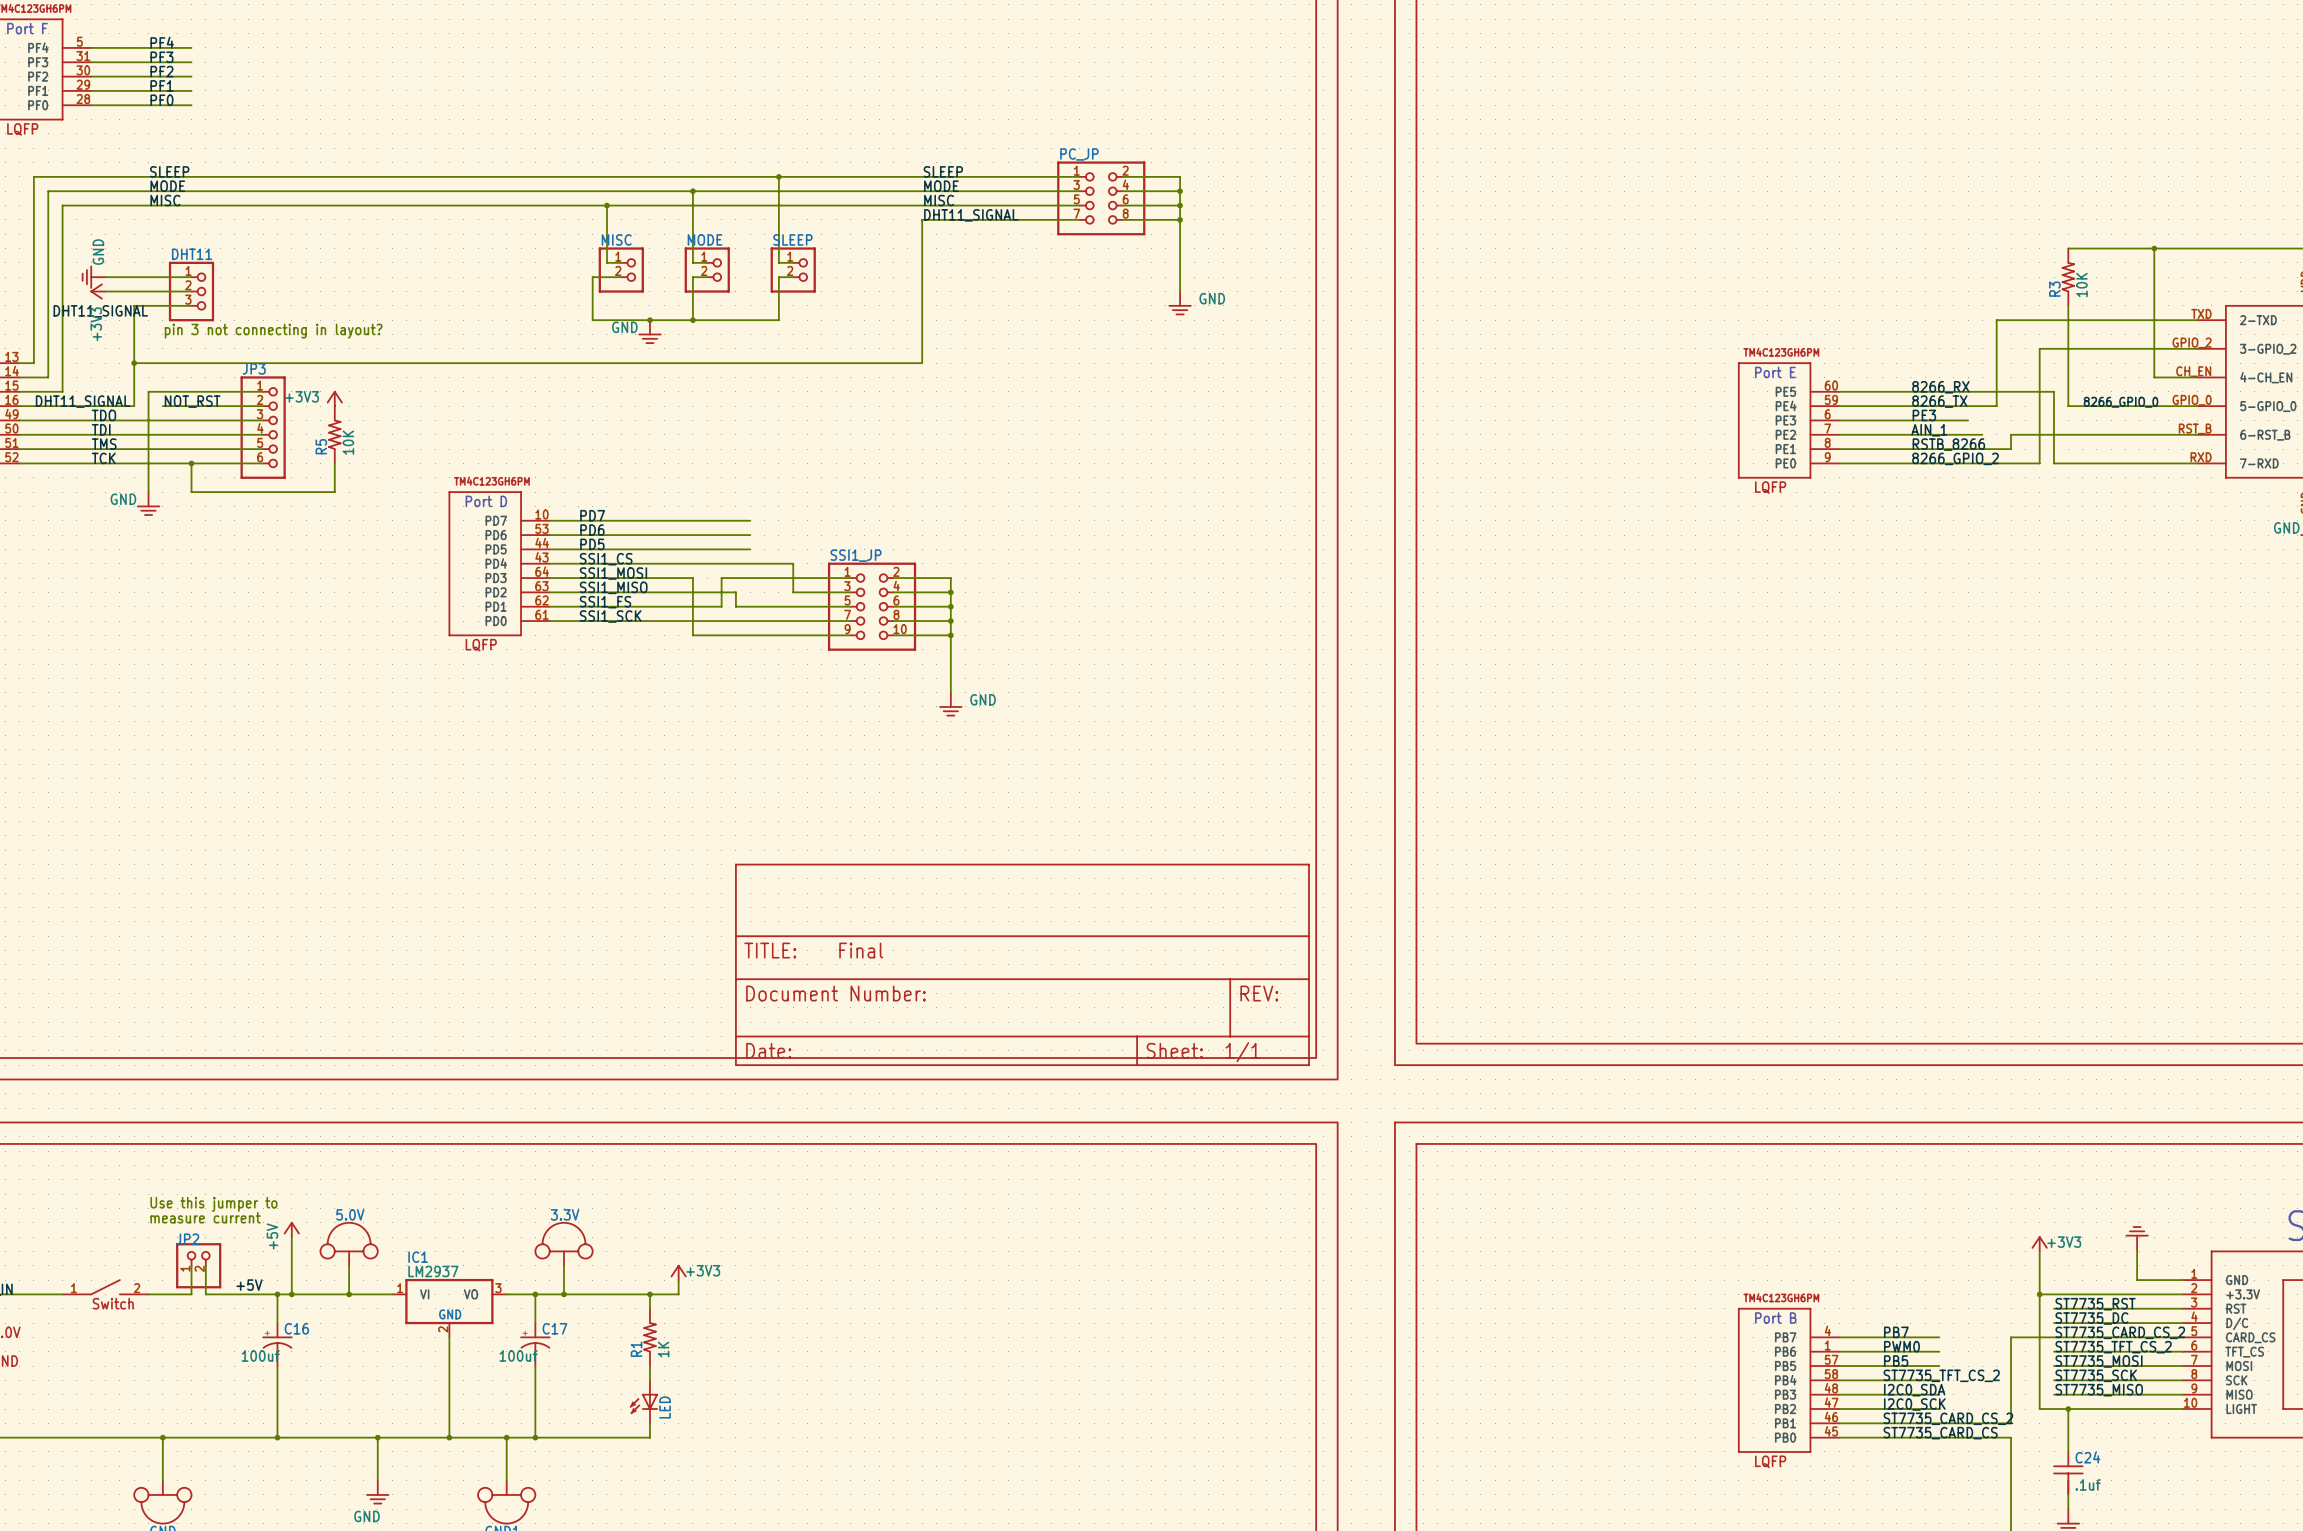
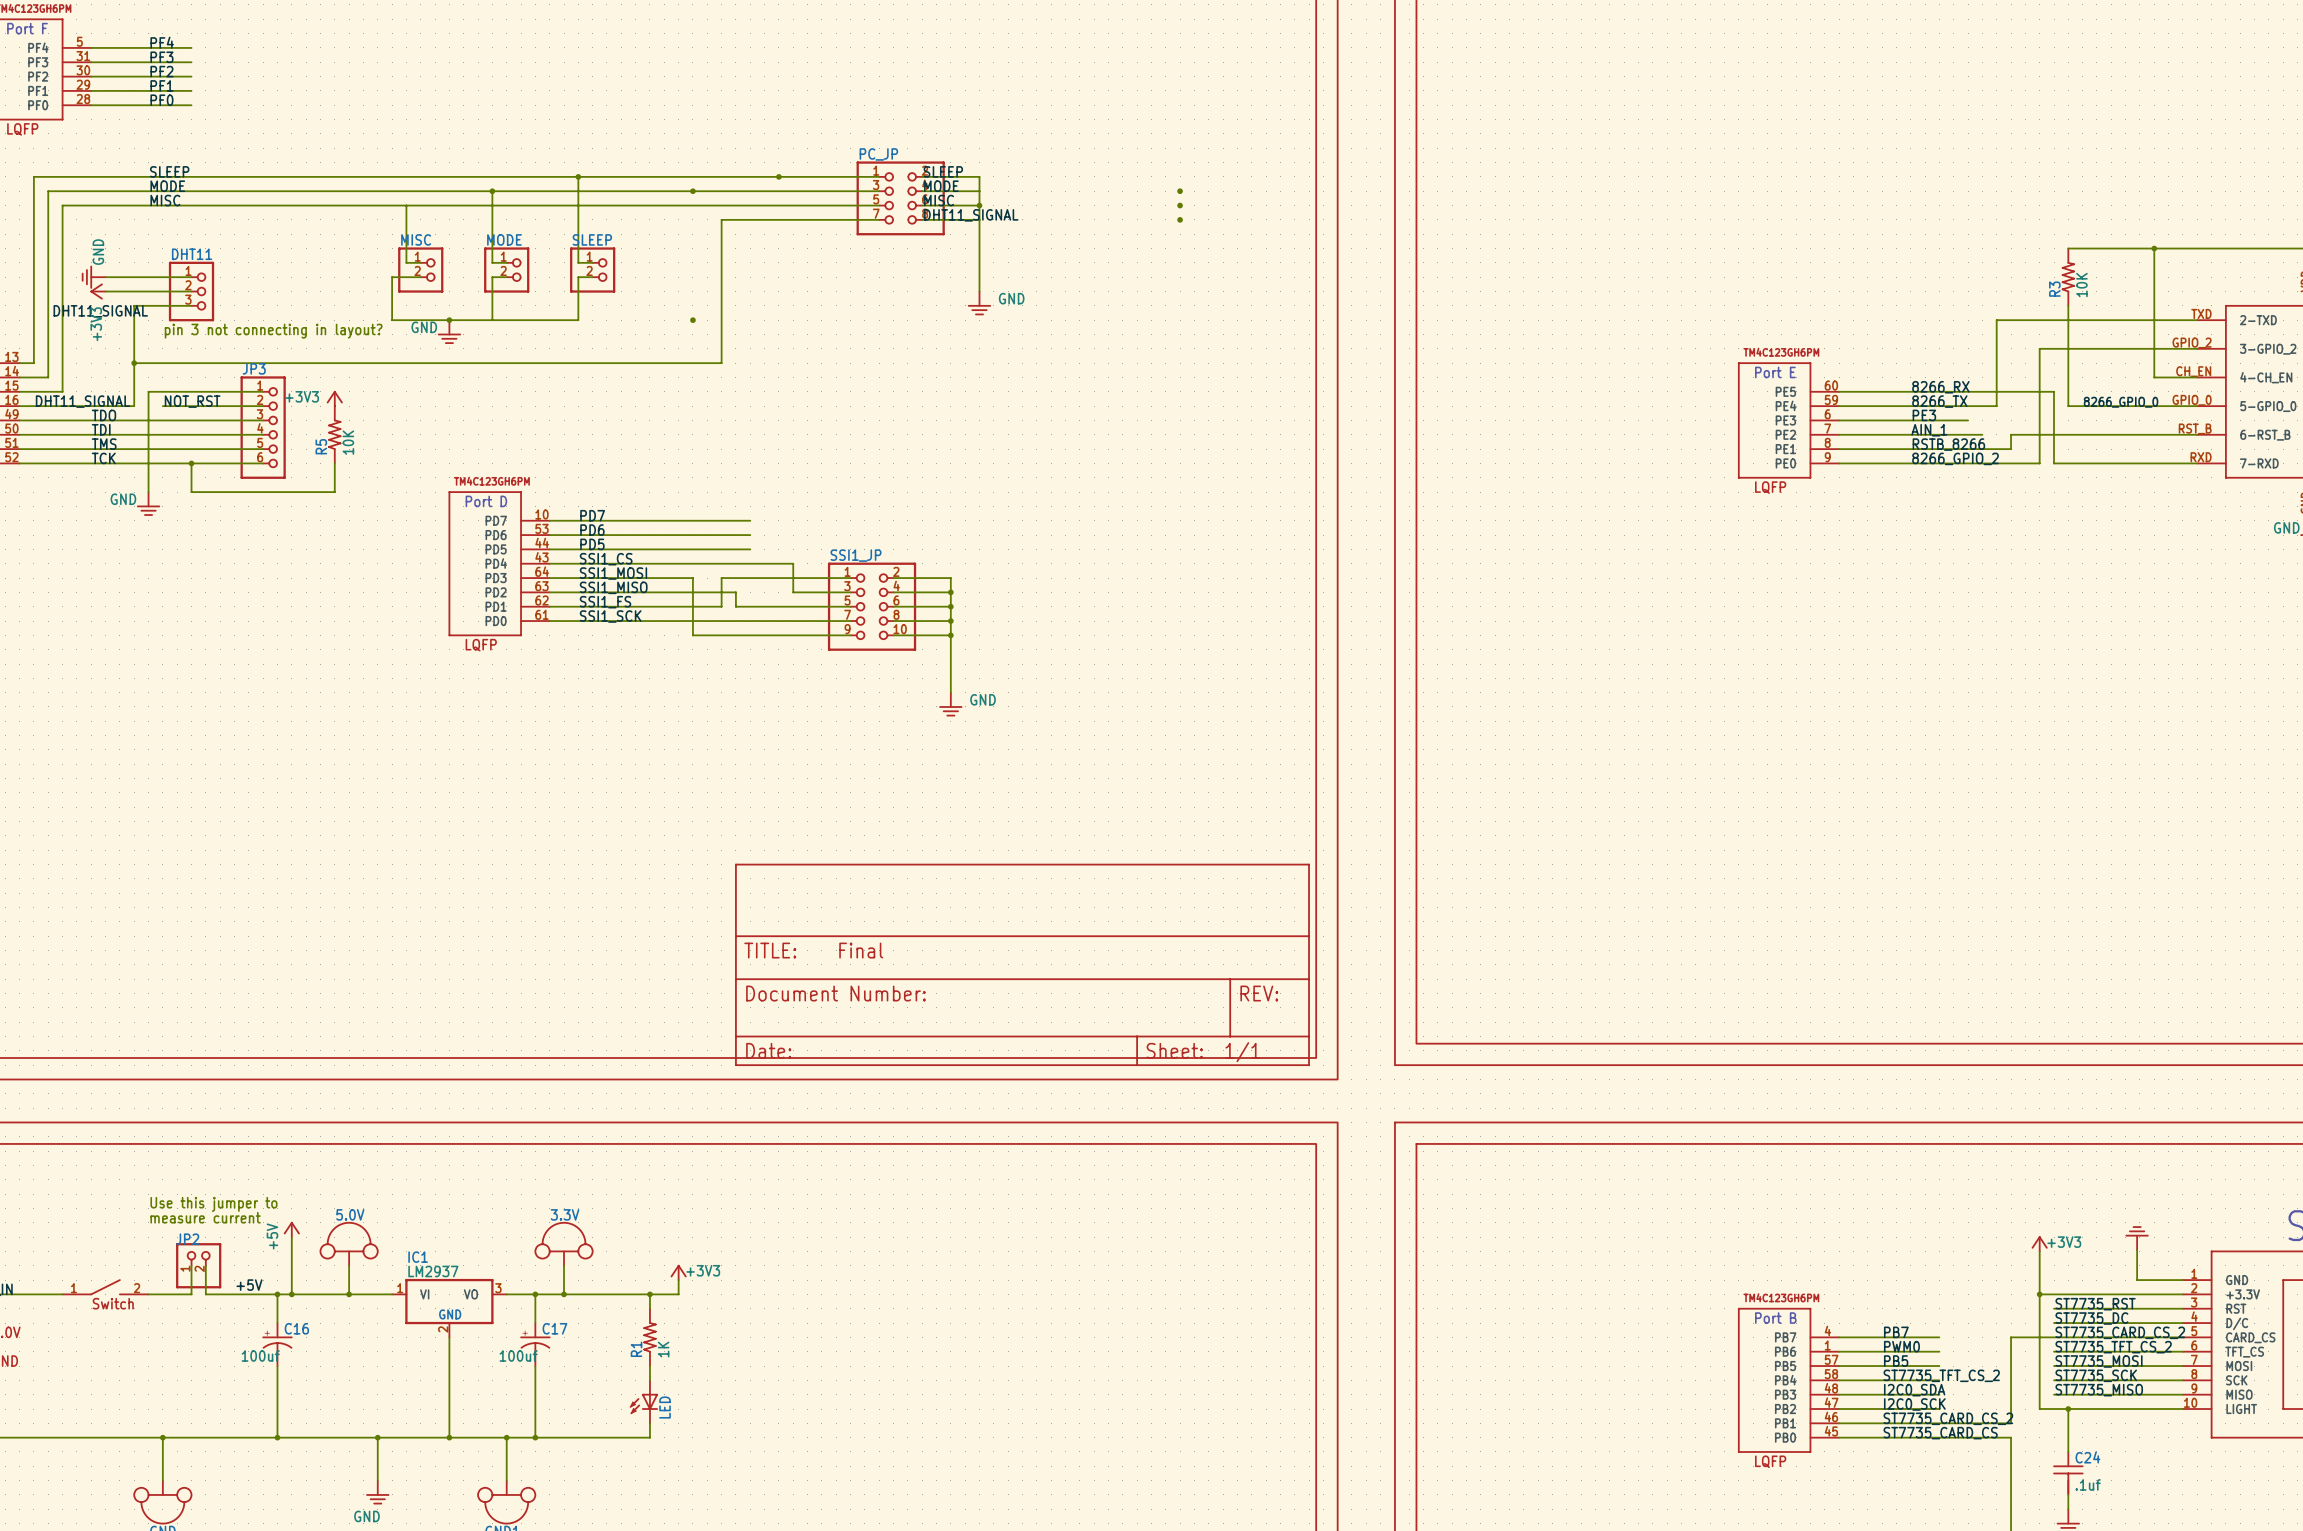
wire: none -> (578, 176) (578, 262) (592, 262)
junction: none -> (578, 176)
wire: (778, 176) (778, 262) (793, 262) -> none
wire: (879, 176) (922, 176) -> none
wire: (979, 176) (1079, 176) -> (979, 176) (979, 291)
wire: (1122, 176) (1180, 176) (1180, 291) -> none
wire: none -> (492, 191) (492, 262) (506, 262)
junction: none -> (492, 191)
wire: (692, 191) (692, 262) (707, 262) -> none
wire: (879, 191) (922, 191) -> none
wire: (979, 191) (1079, 191) -> none
wire: (1122, 191) (1180, 191) -> none
PC_JP: none -> (900, 198)
PC_JP: (1101, 198) -> none
wire: none -> (406, 205) (406, 262) (420, 262)
wire: (606, 205) (606, 262) (621, 262) -> none
junction: (606, 205) -> none
wire: (879, 205) (922, 205) -> none
wire: (979, 205) (1079, 205) -> none
junction: none -> (979, 205)
wire: (1122, 205) (1180, 205) -> none
wire: (922, 219) (922, 363) (721, 363) -> (879, 219) (721, 219) (721, 363)
wire: (979, 219) (1079, 219) -> none
wire: (1122, 219) (1180, 219) -> none
MISC: none -> (420, 270)
MODE: none -> (506, 270)
SLEEP: none -> (592, 270)
MISC: (621, 270) -> none
MODE: (707, 270) -> none
SLEEP: (793, 270) -> none
wire: none -> (420, 277) (392, 277) (392, 320) (578, 320) (578, 277) (592, 277)
wire: none -> (506, 277) (492, 277) (492, 320)
wire: (621, 277) (592, 277) (592, 320) (778, 320) (778, 277) (793, 277) -> none
wire: (707, 277) (692, 277) (692, 320) -> none
power symbol: none -> GND (979, 303)
power symbol: GND (1180, 303) -> none
junction: none -> (449, 320)
junction: (649, 320) -> none
power symbol: none -> GND (449, 331)
power symbol: GND (649, 331) -> none

